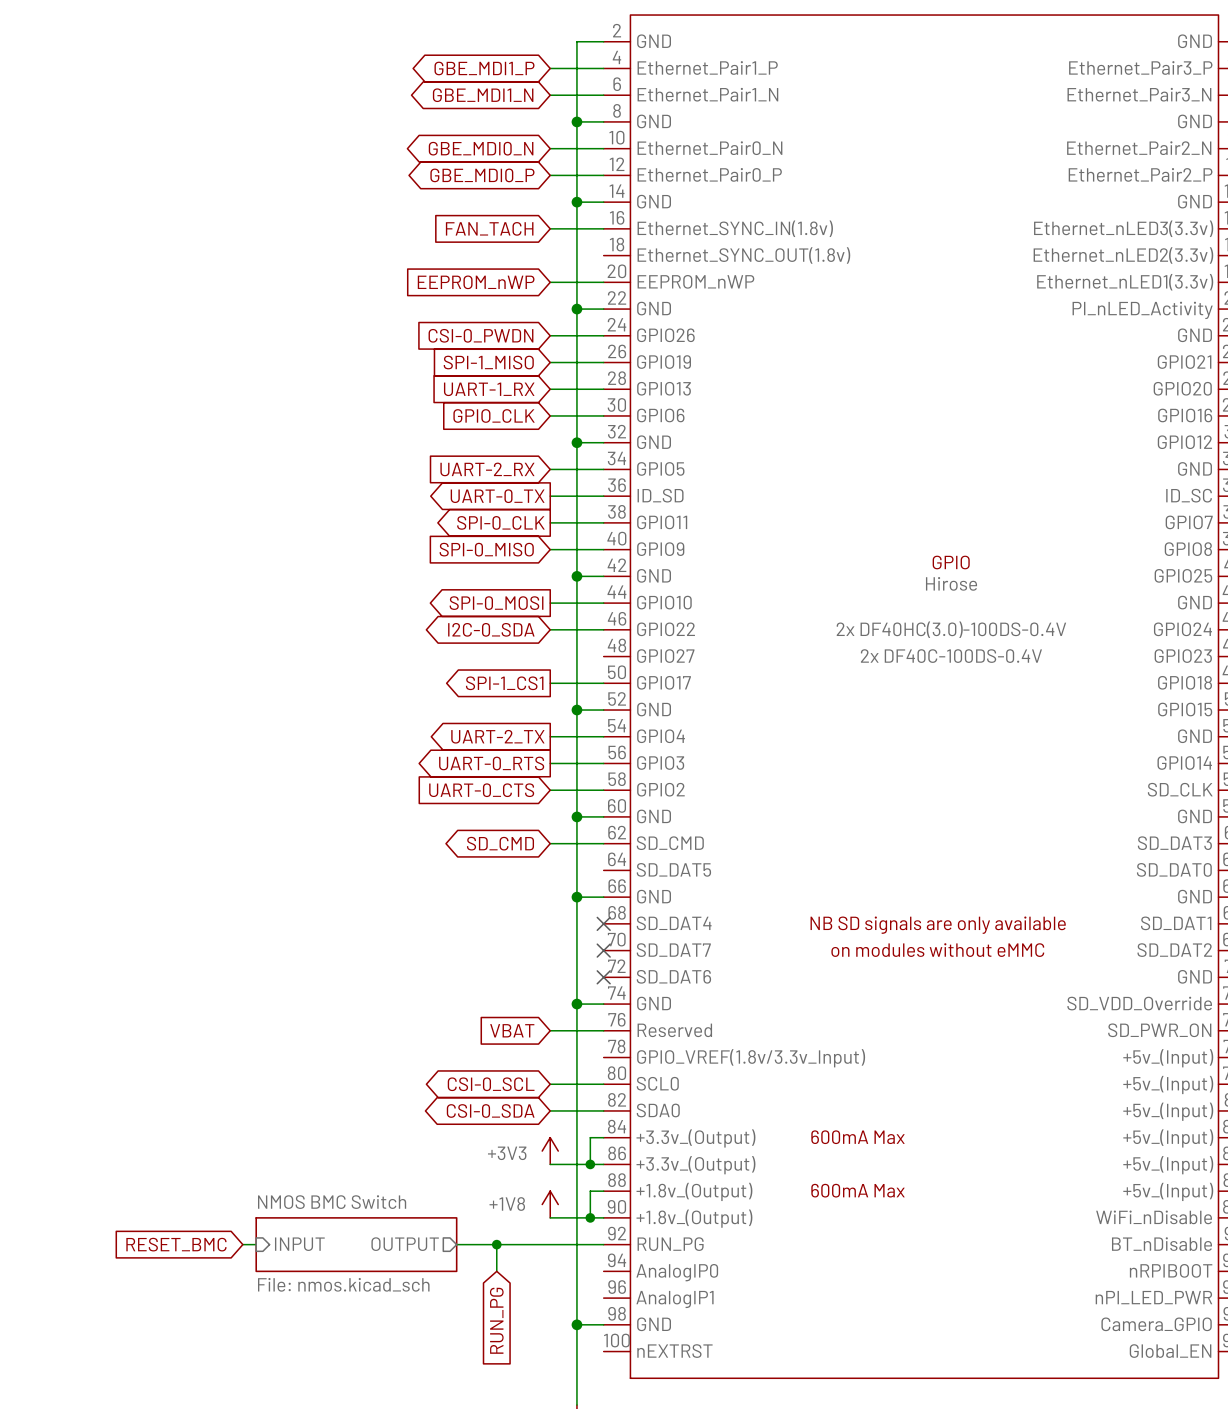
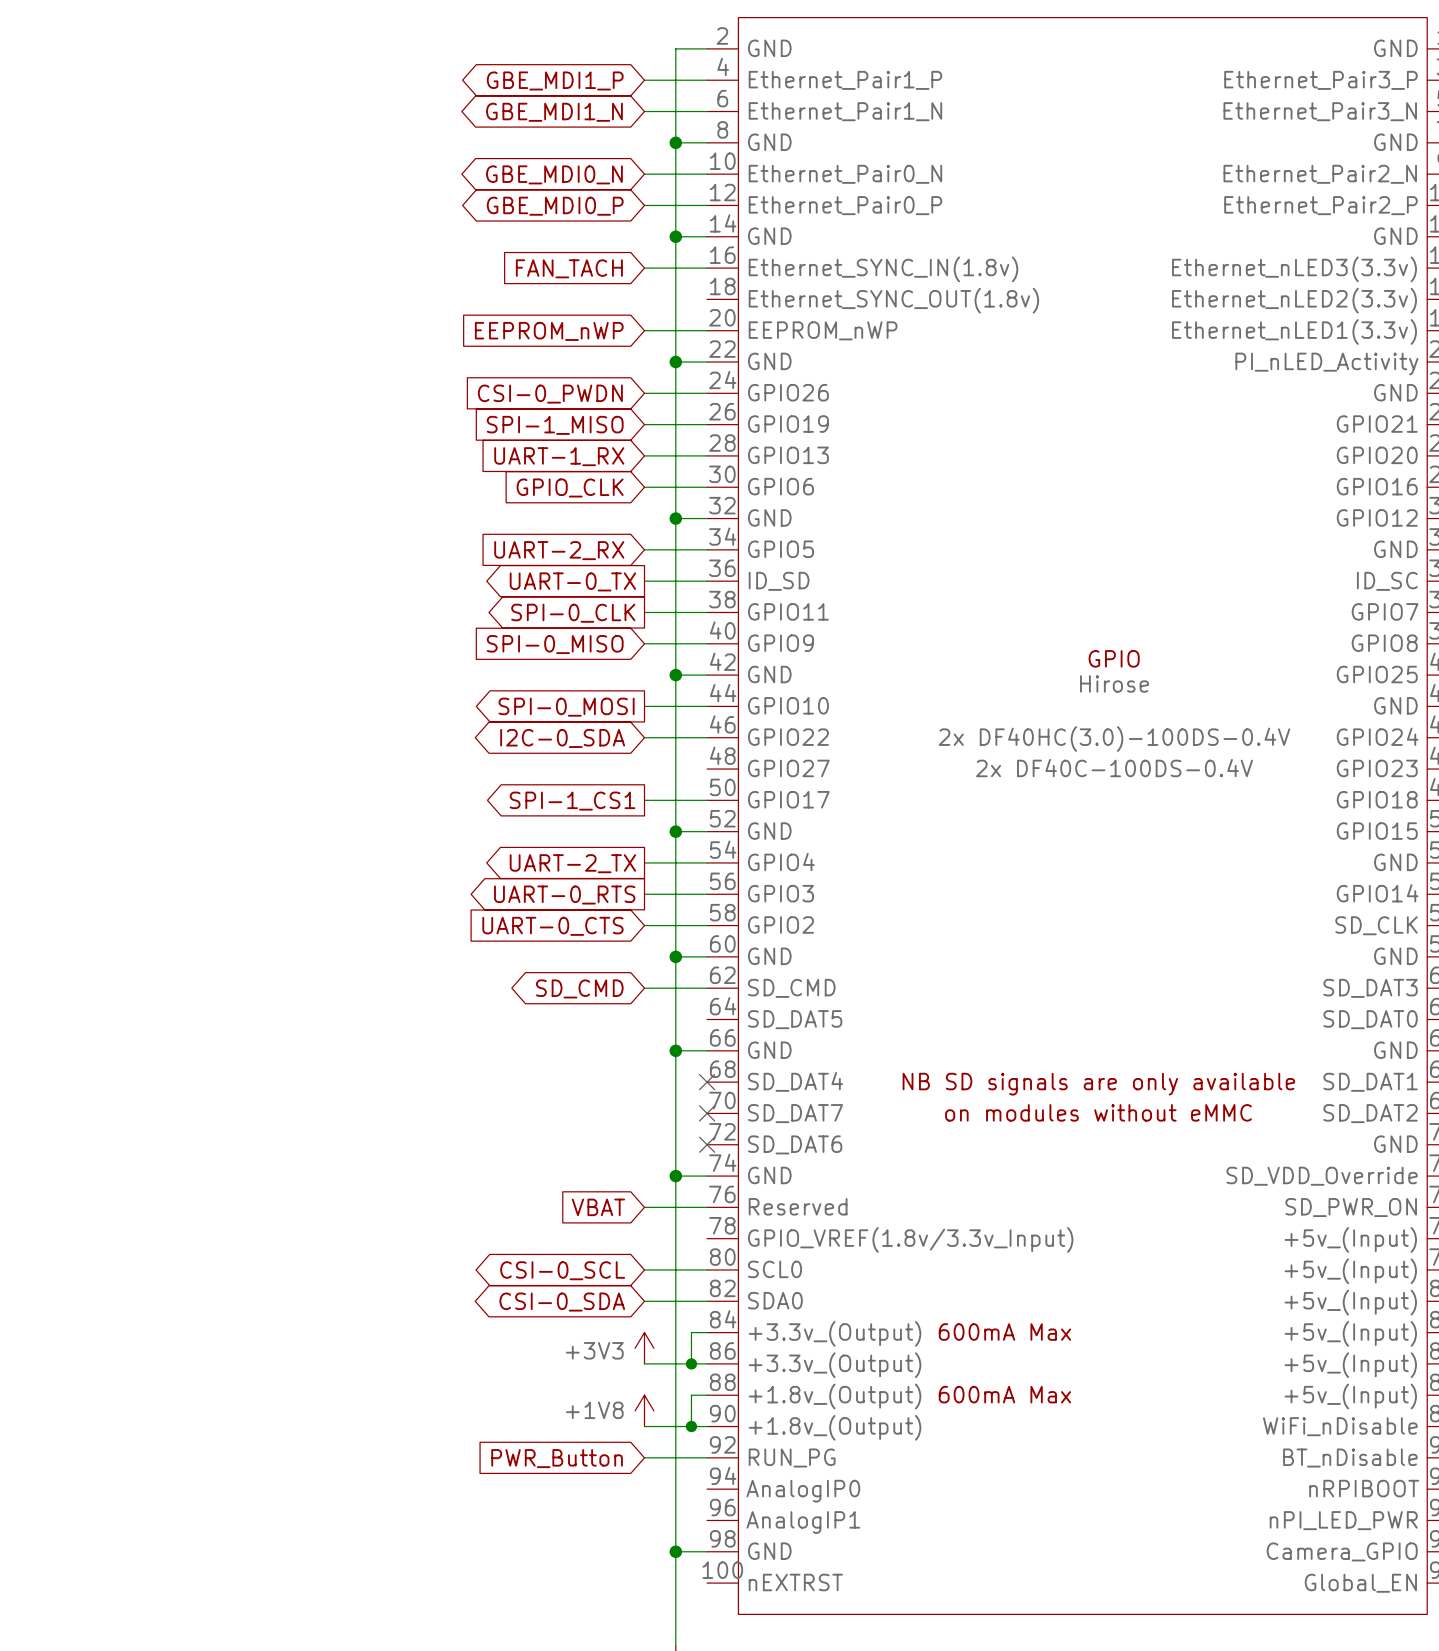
global label: RESET_BMC (176, 1244) -> none
wire: (242, 1244) (256, 1244) -> none
sheet pin: INPUT (299, 1244) -> none
sheet NMOS BMC Switch: File: nmos.kicad_sch (356, 1244) -> none
sheet pin: OUTPUT (405, 1244) -> none
wire: (456, 1244) (550, 1244) -> none
global label: none -> PWR_Button (557, 1458)
wire: (496, 1244) (496, 1271) -> none
junction: (496, 1244) -> none
global label: RUN_PG (496, 1320) -> none

